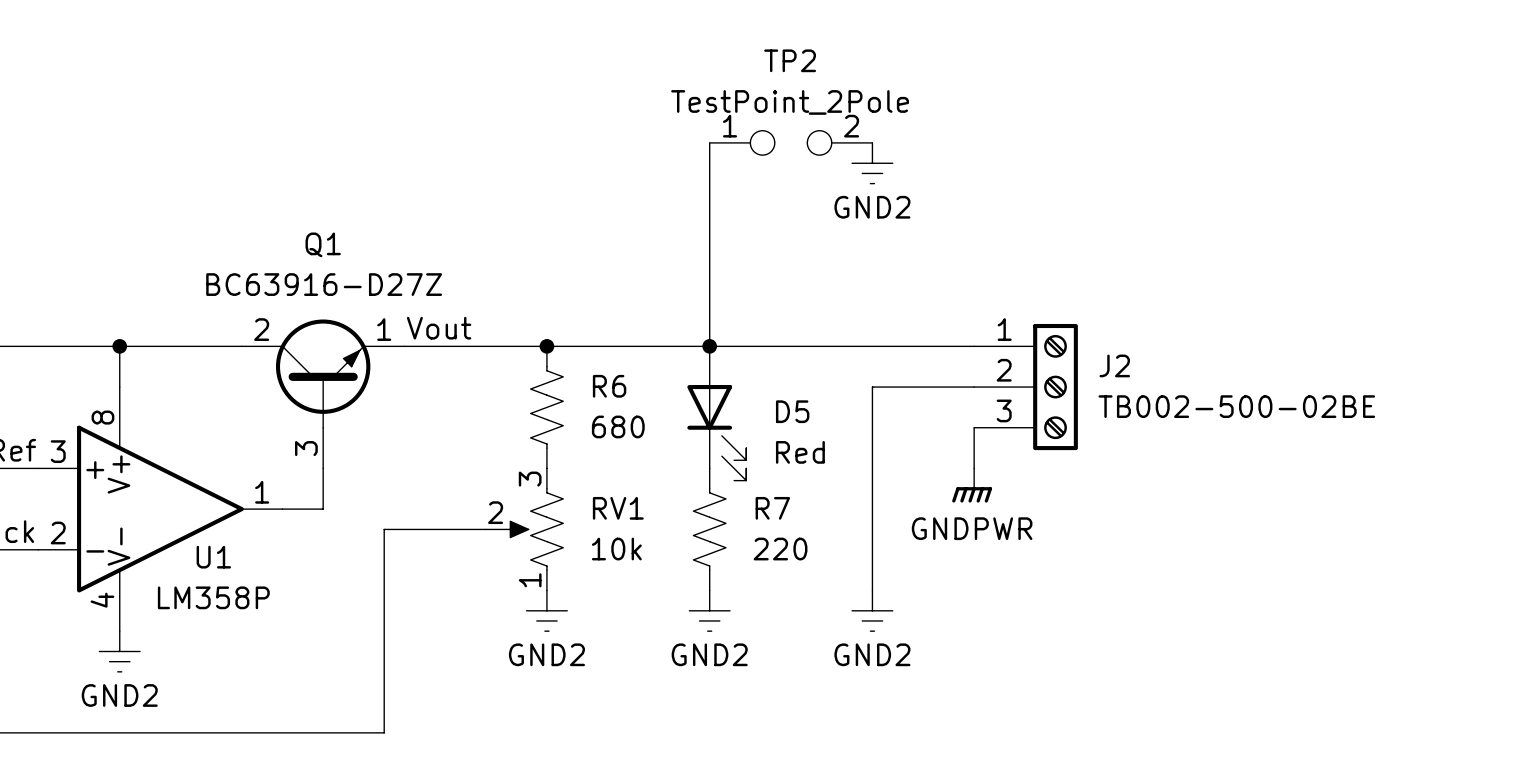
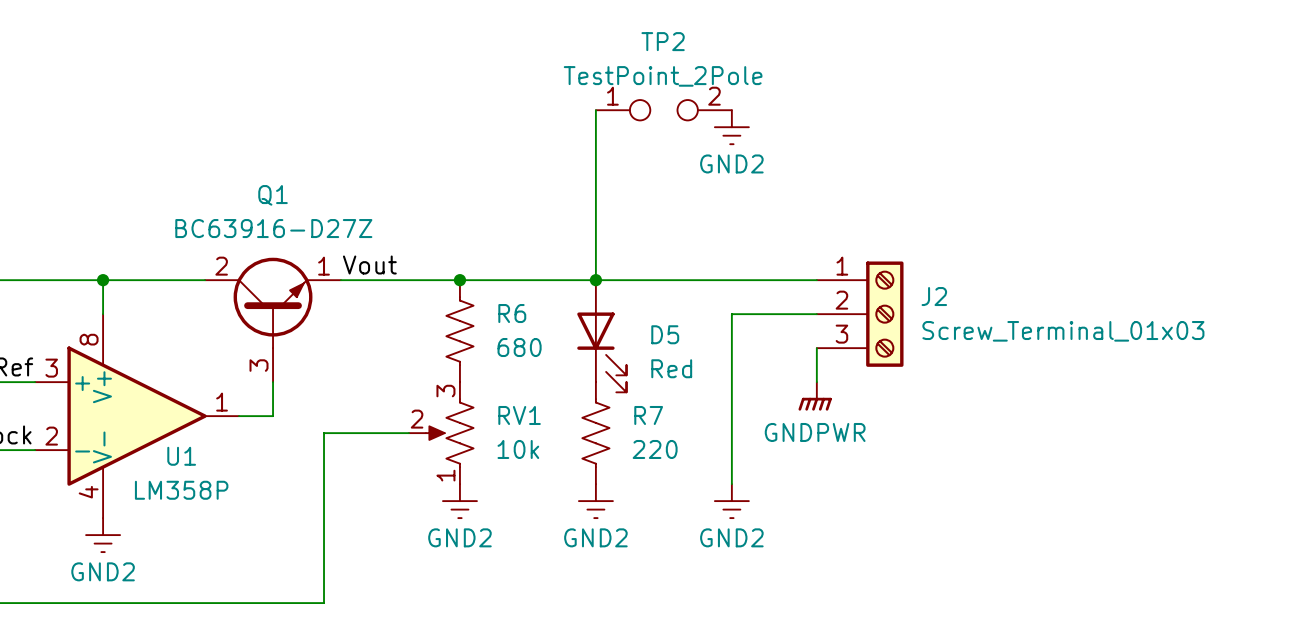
J2 value: TB002-500-02BE (1236, 406) -> Screw_Terminal_01x03 (1063, 331)

